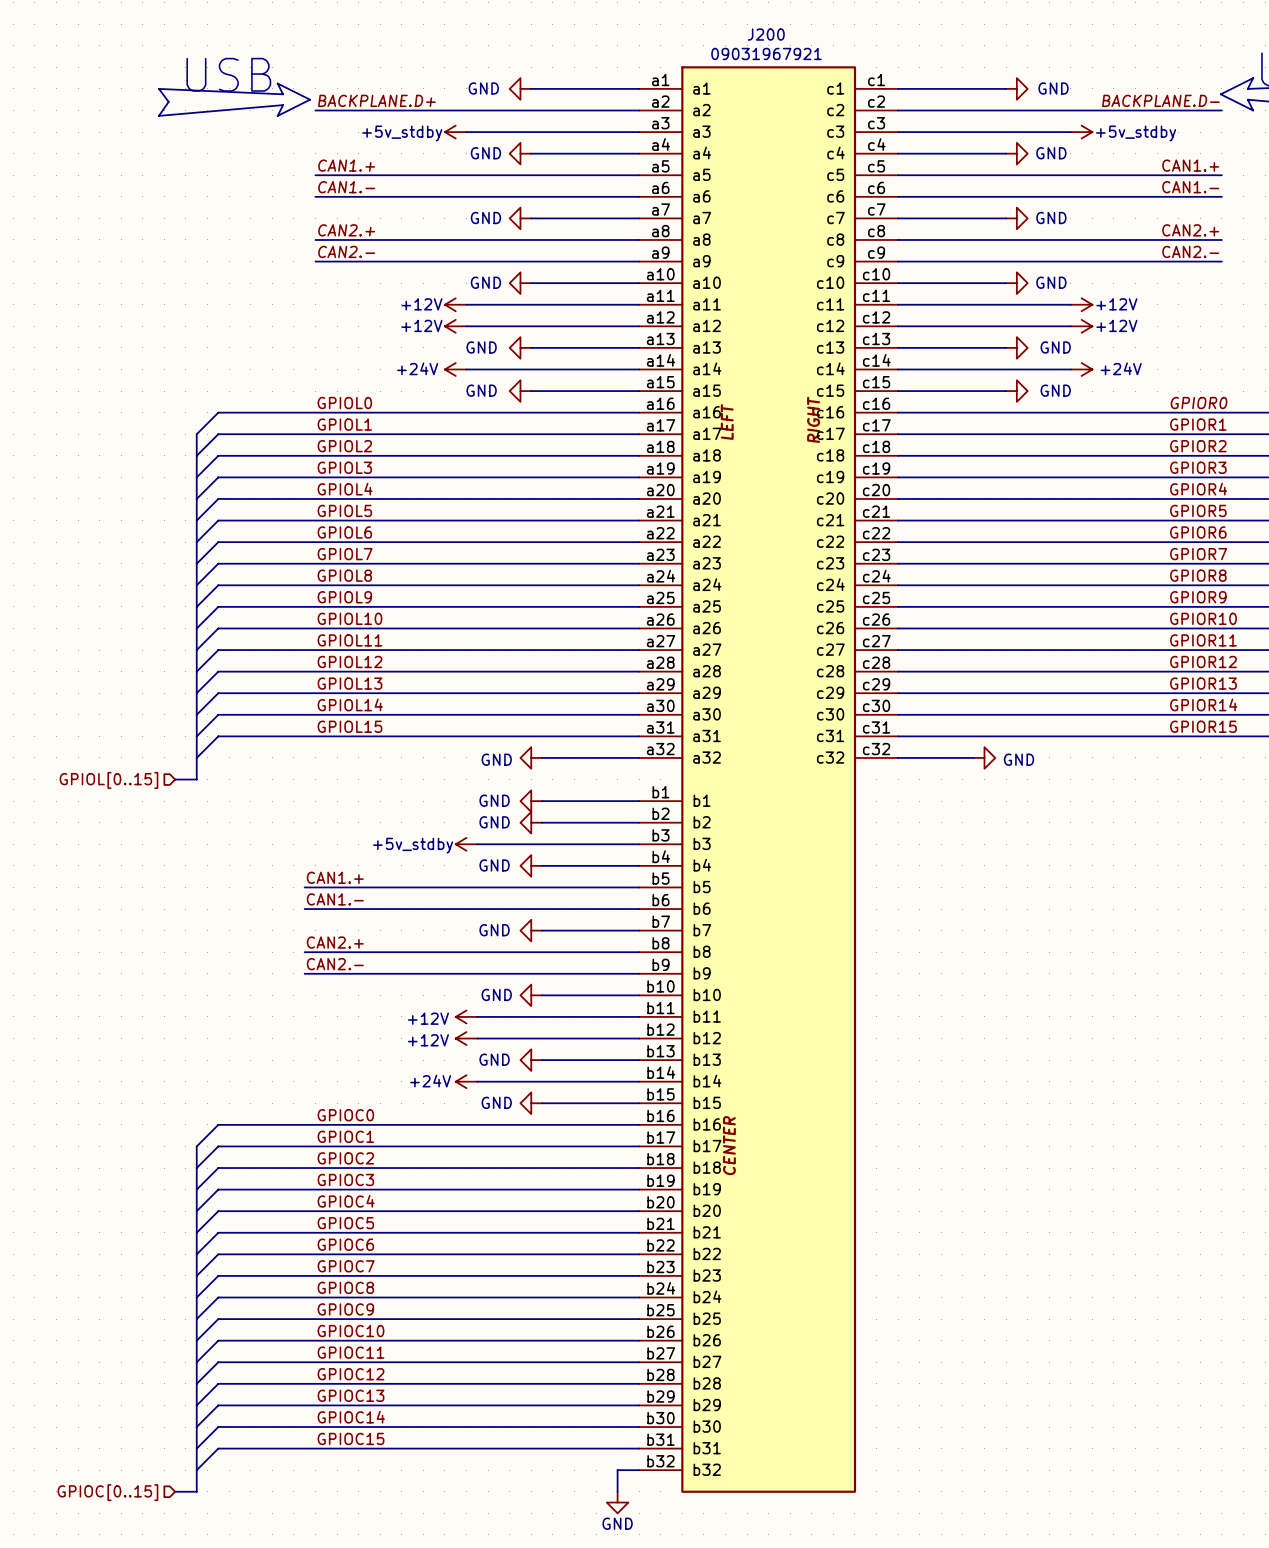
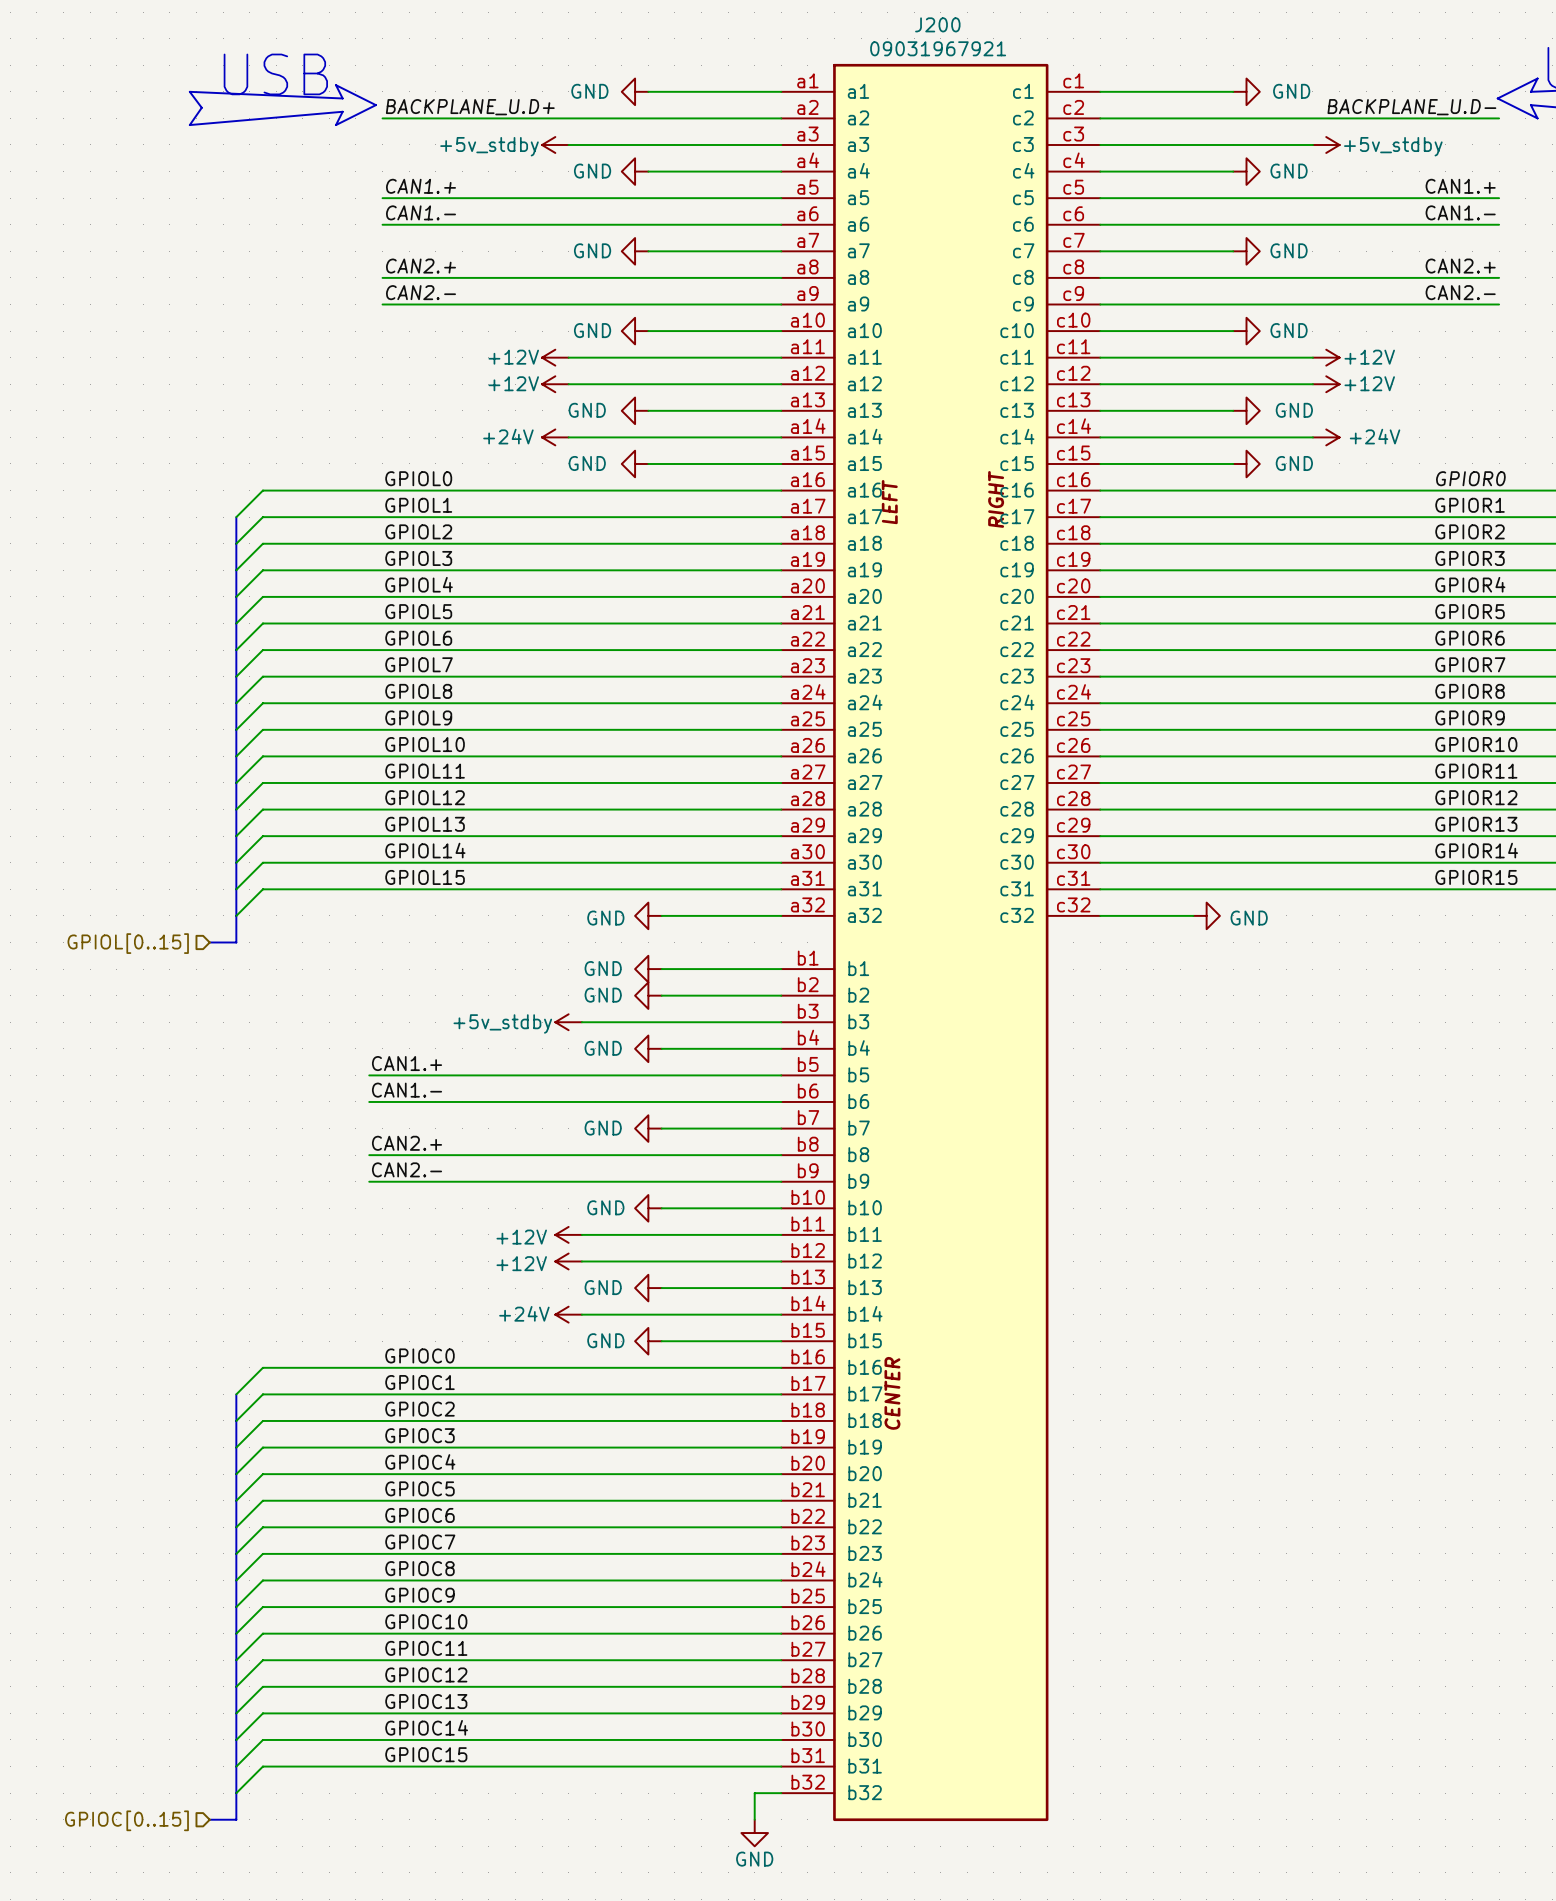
label: BACKPLANE.D+ (376, 100) -> BACKPLANE_U.D+ (470, 107)
label: BACKPLANE.D- (1160, 100) -> BACKPLANE_U.D- (1411, 107)

